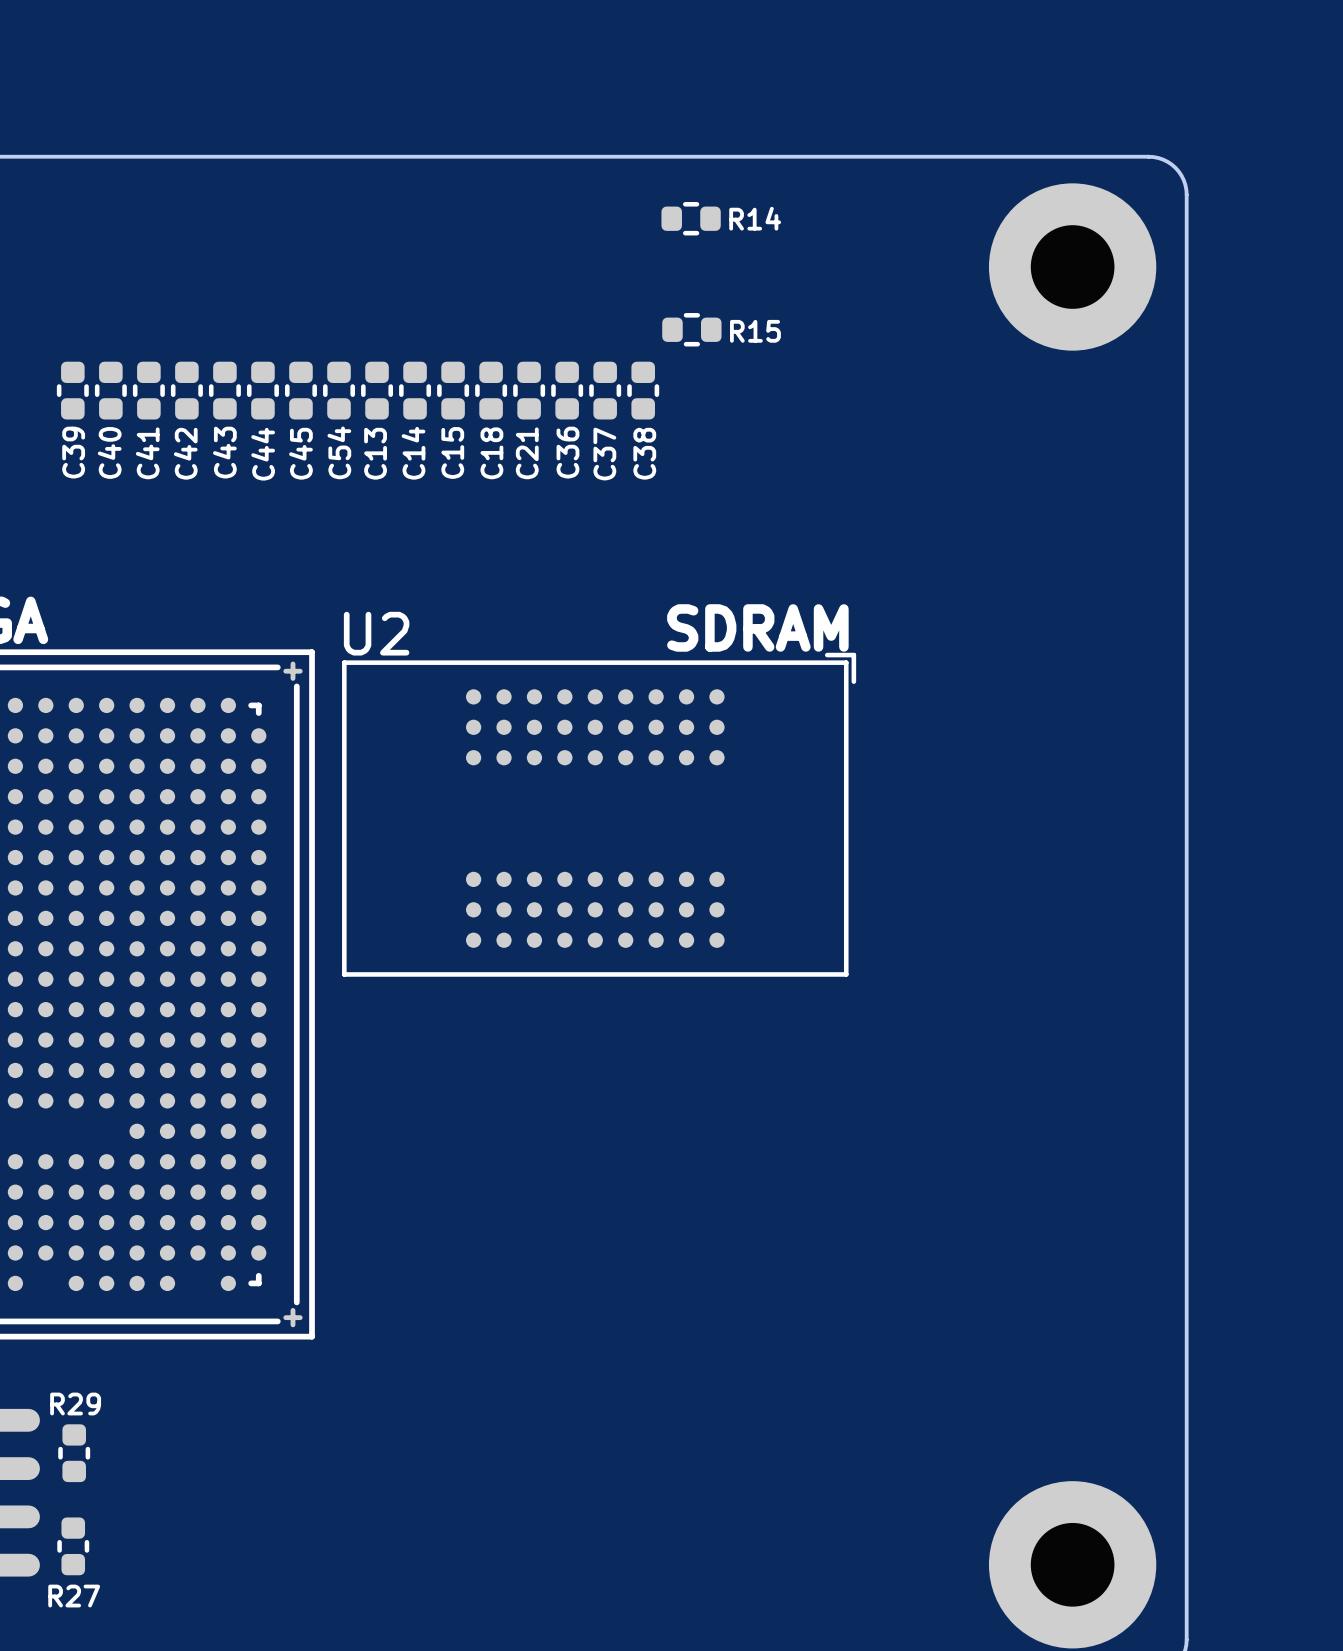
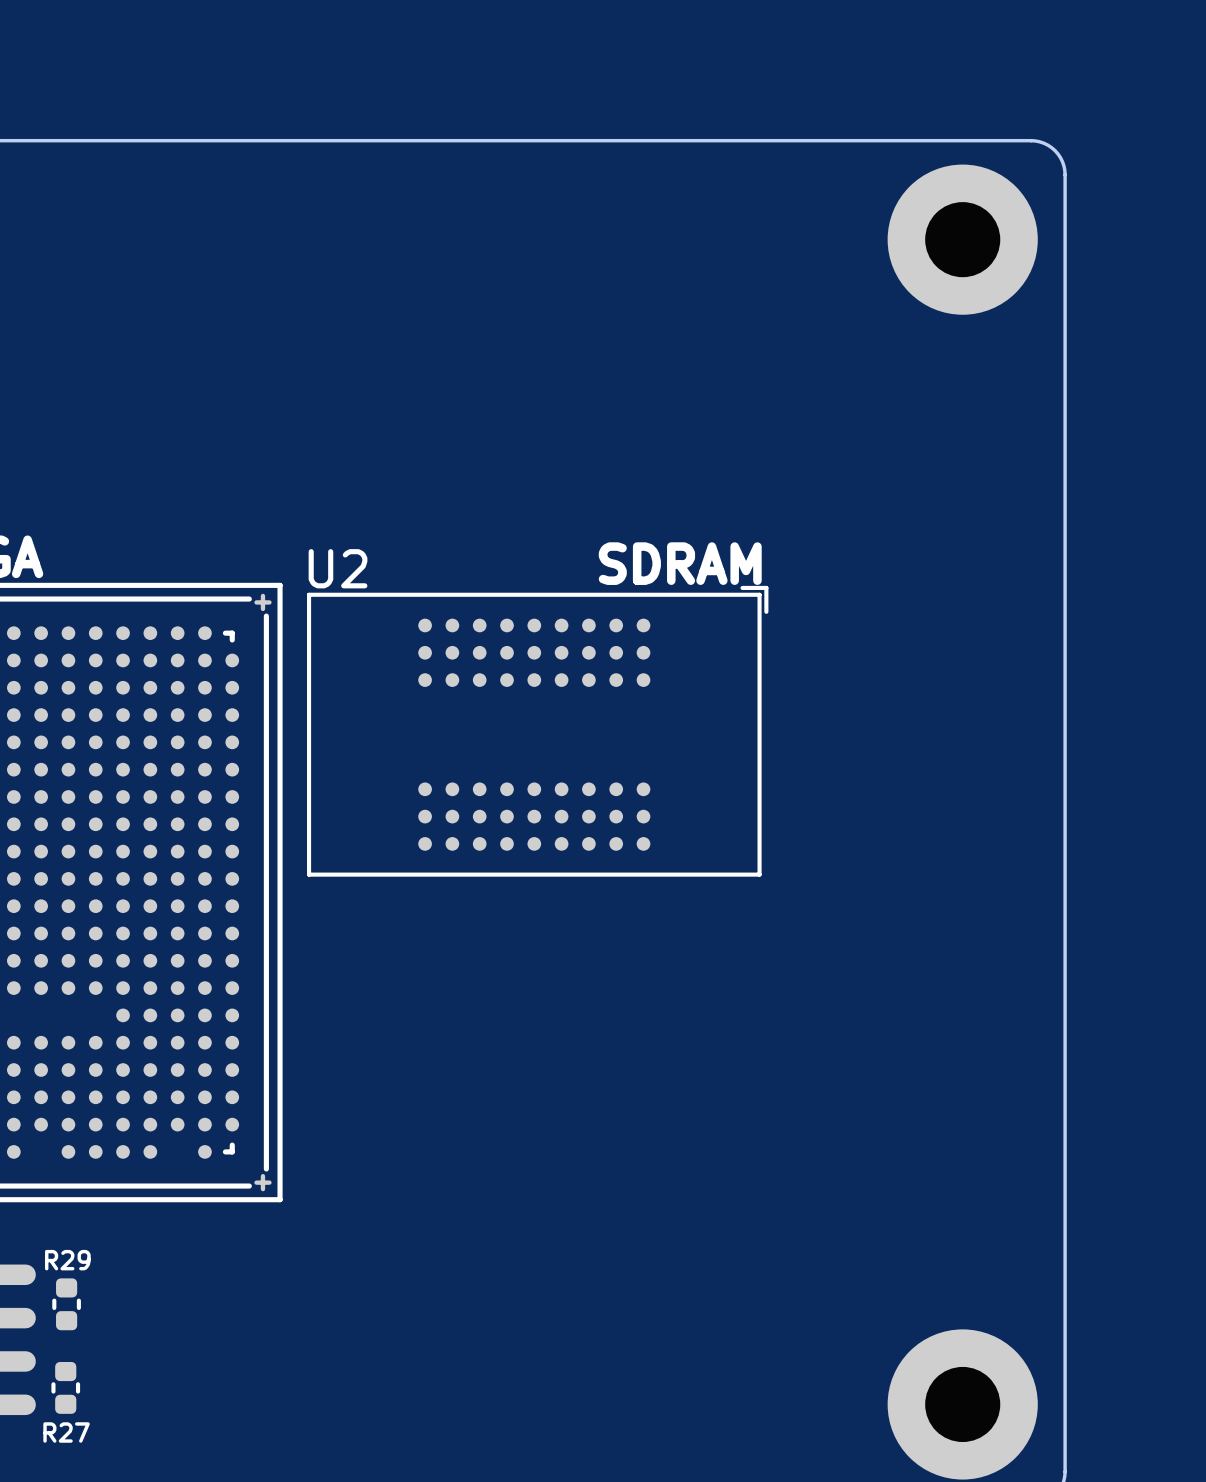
R14: (691, 218) -> none
R15: (691, 329) -> none
C39: (72, 390) -> none
C40: (110, 390) -> none
C41: (148, 390) -> none
C42: (186, 390) -> none
C43: (224, 390) -> none
C44: (262, 390) -> none
C45: (300, 390) -> none
C54: (339, 390) -> none
C13: (377, 390) -> none
C14: (415, 390) -> none
C15: (453, 390) -> none
C18: (491, 390) -> none
C21: (529, 390) -> none
C36: (567, 390) -> none
C37: (605, 390) -> none
C38: (643, 390) -> none

